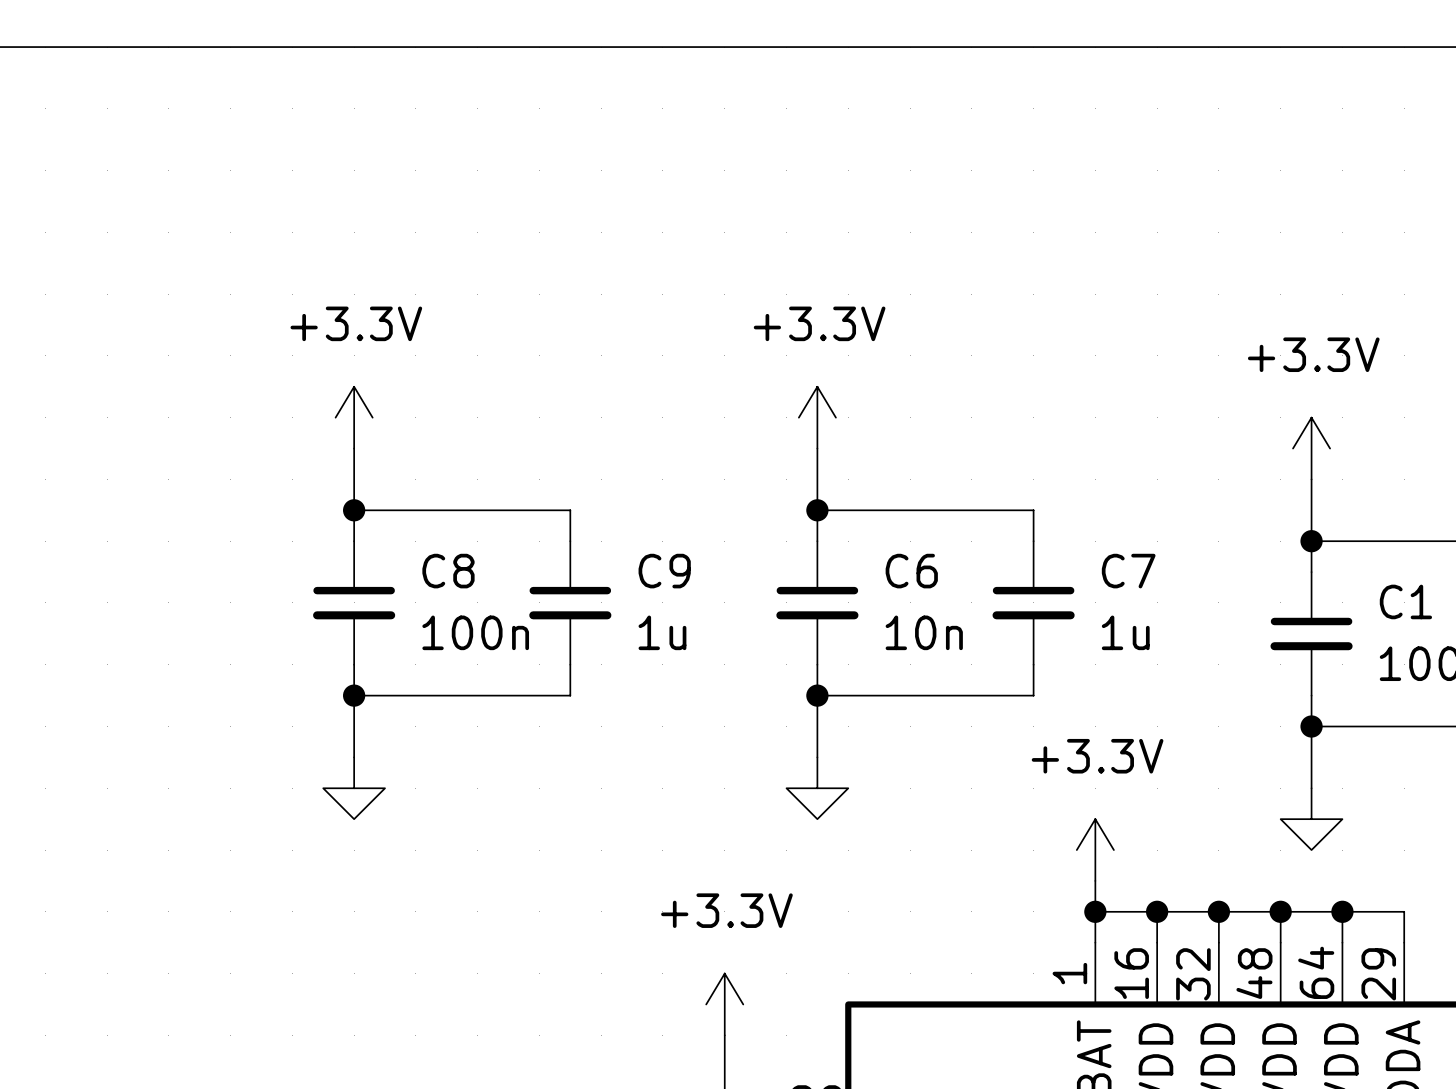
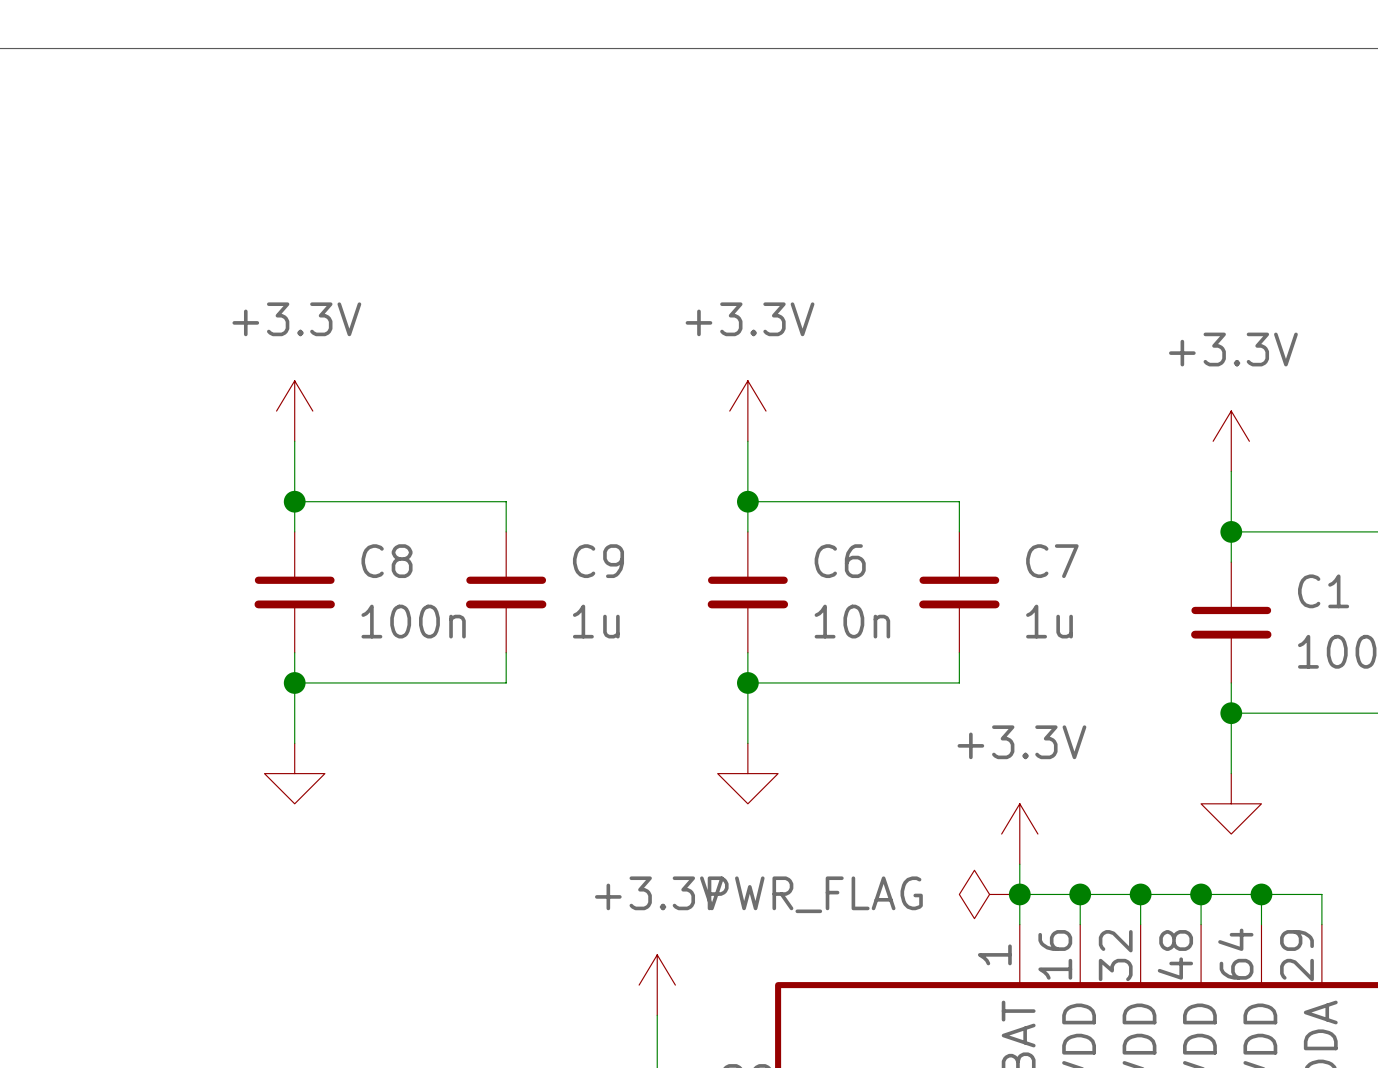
power symbol: none -> PWR_FLAG (989, 894)

